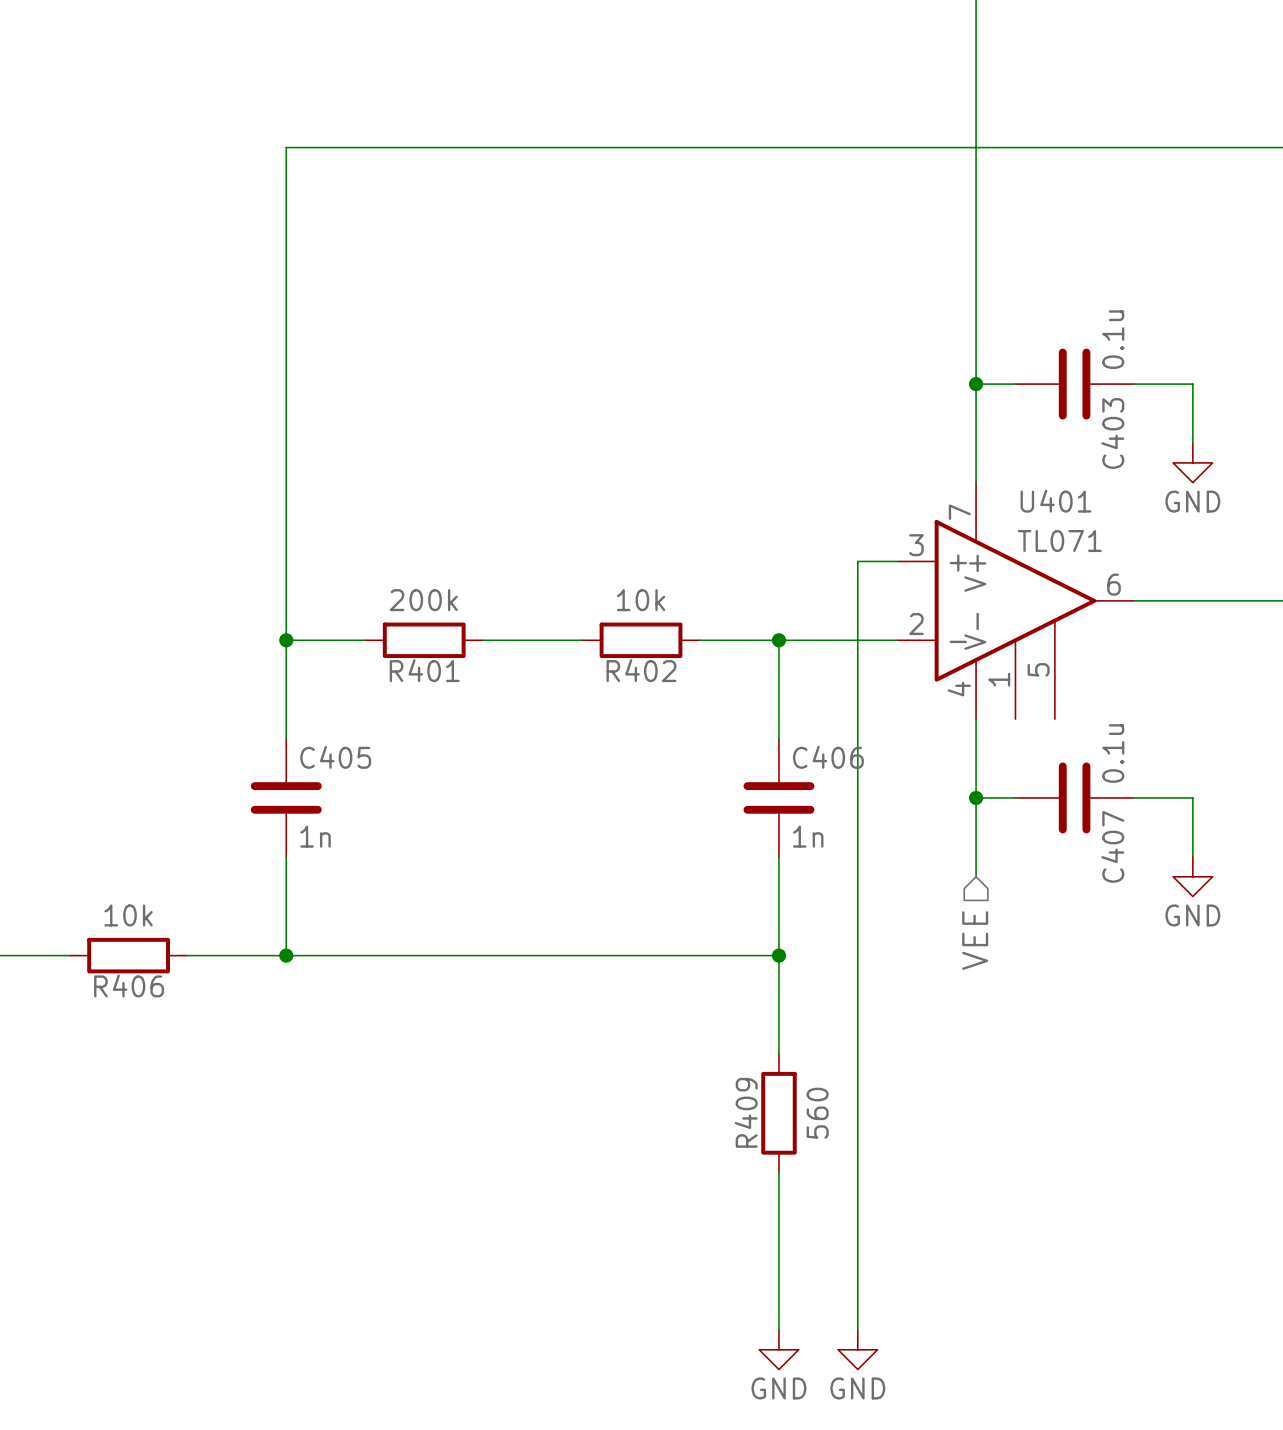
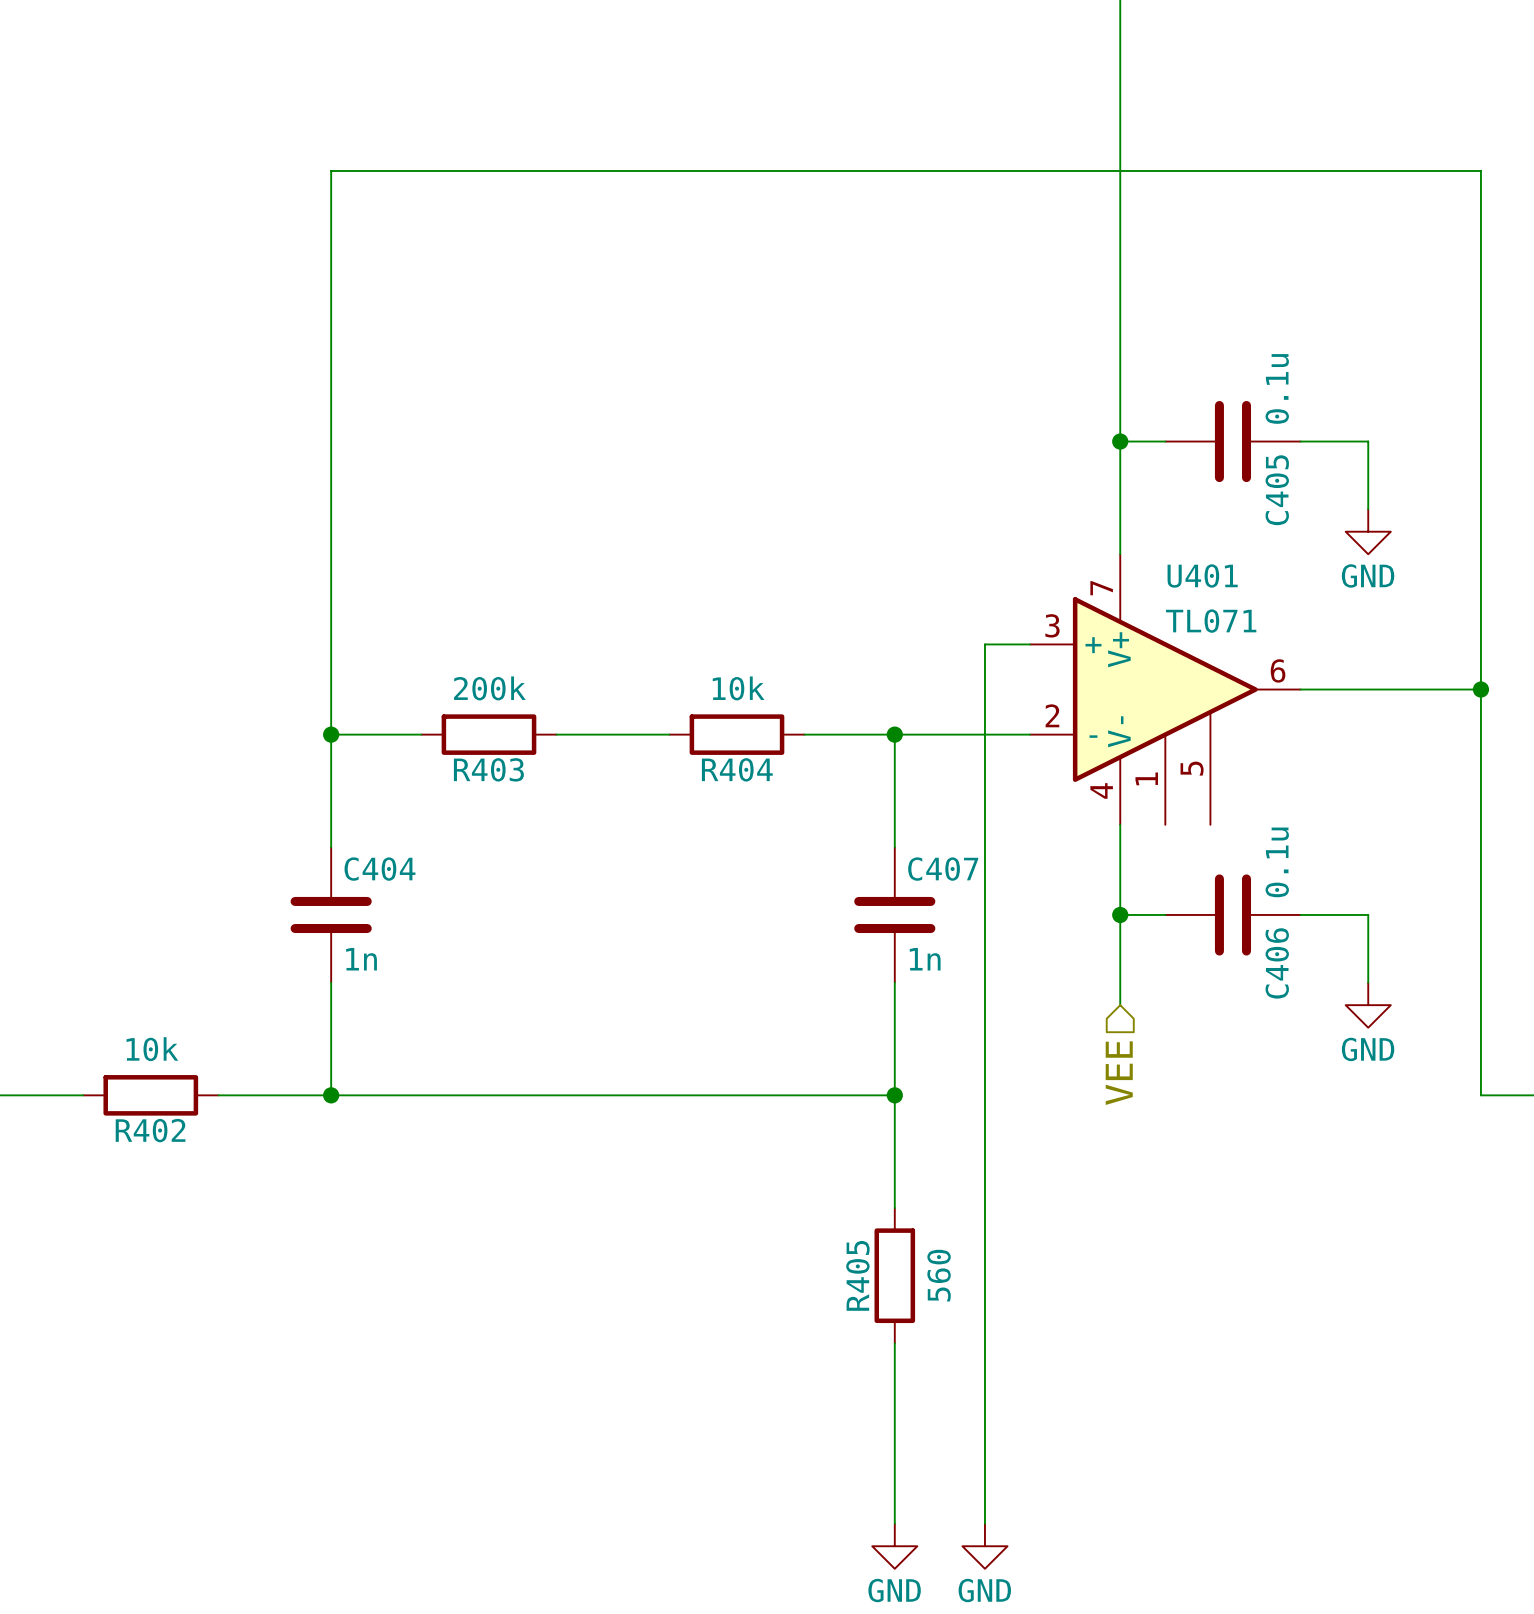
C403 name: C403 (1112, 433) -> C405 (1277, 490)
R401 name: R401 (424, 670) -> R403 (488, 769)
R402 name: R402 (641, 670) -> R404 (737, 769)
C405 name: C405 (335, 757) -> C404 (379, 869)
C406 name: C406 (828, 757) -> C407 (943, 869)
C407 name: C407 (1112, 846) -> C406 (1277, 963)
R406 name: R406 (129, 985) -> R402 (150, 1130)
R409 name: R409 (746, 1112) -> R405 (857, 1275)

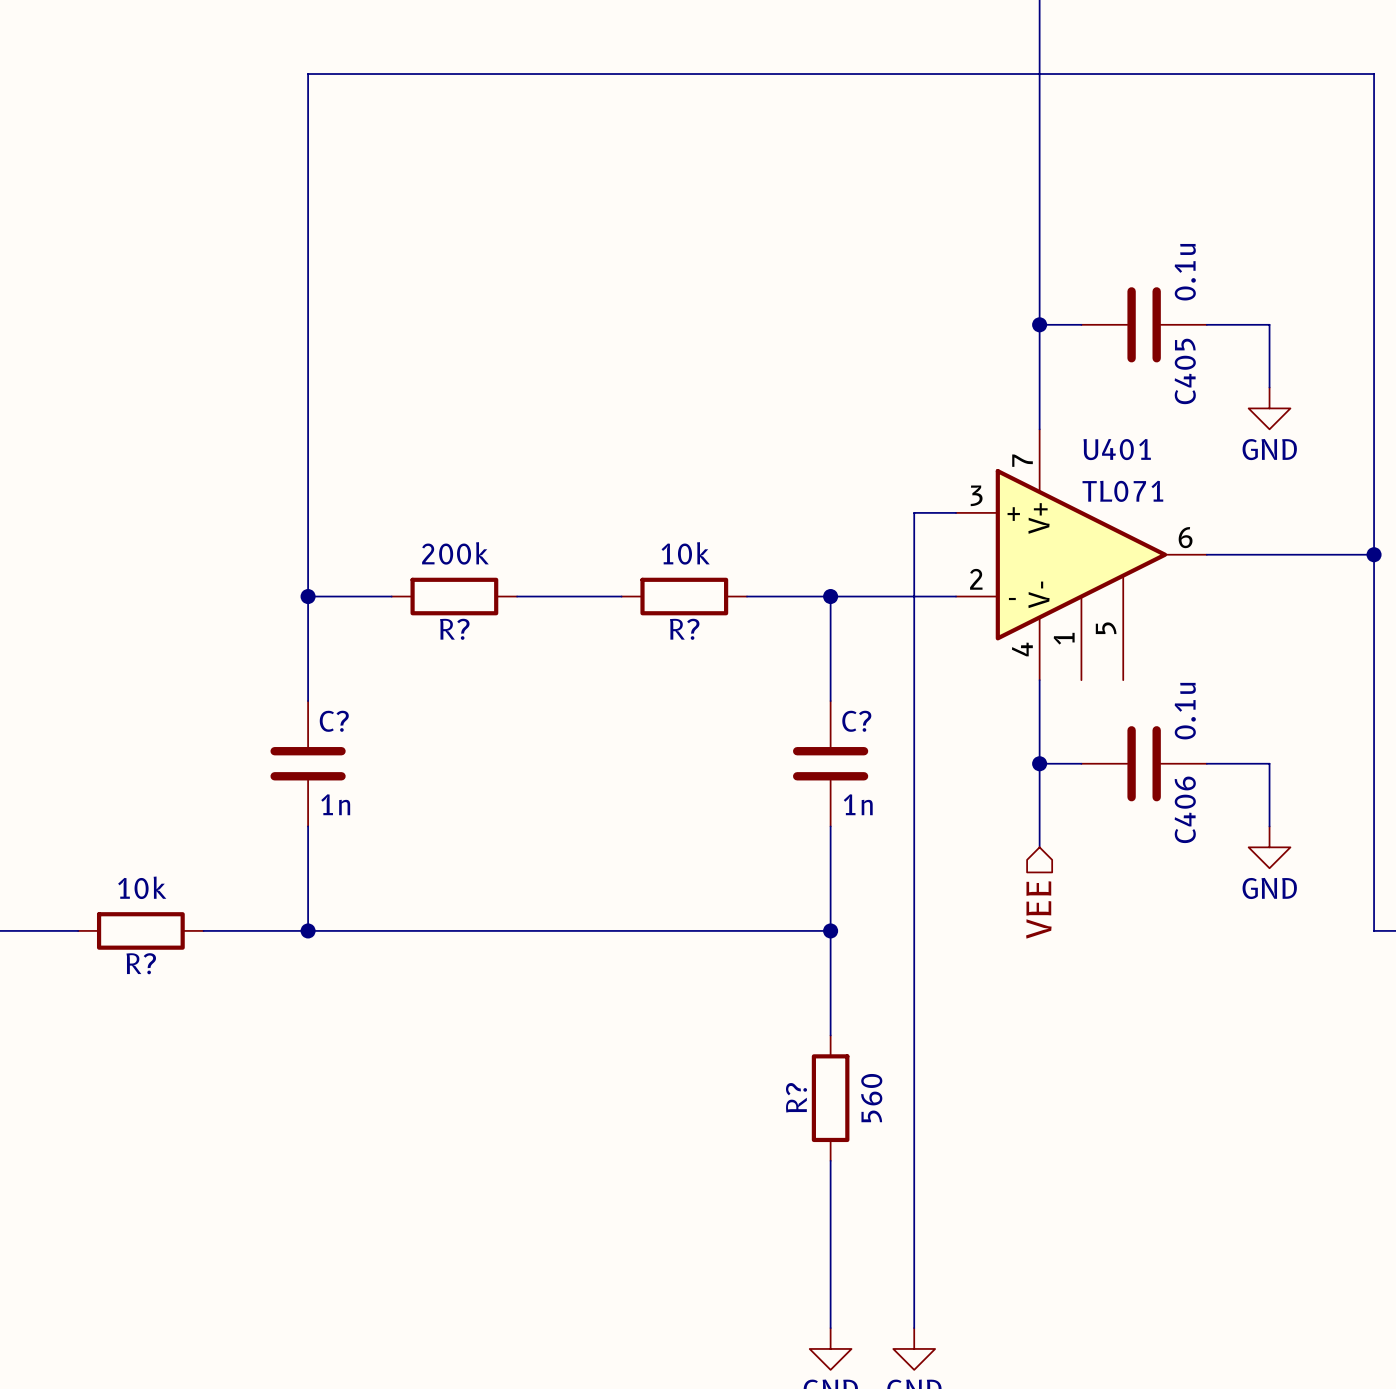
R403 name: R403 (488, 769) -> R? (454, 629)
R404 name: R404 (737, 769) -> R? (684, 629)
C404 name: C404 (379, 869) -> C? (334, 721)
C407 name: C407 (943, 869) -> C? (856, 721)
R402 name: R402 (150, 1130) -> R? (141, 963)
R405 name: R405 (857, 1275) -> R? (796, 1097)

